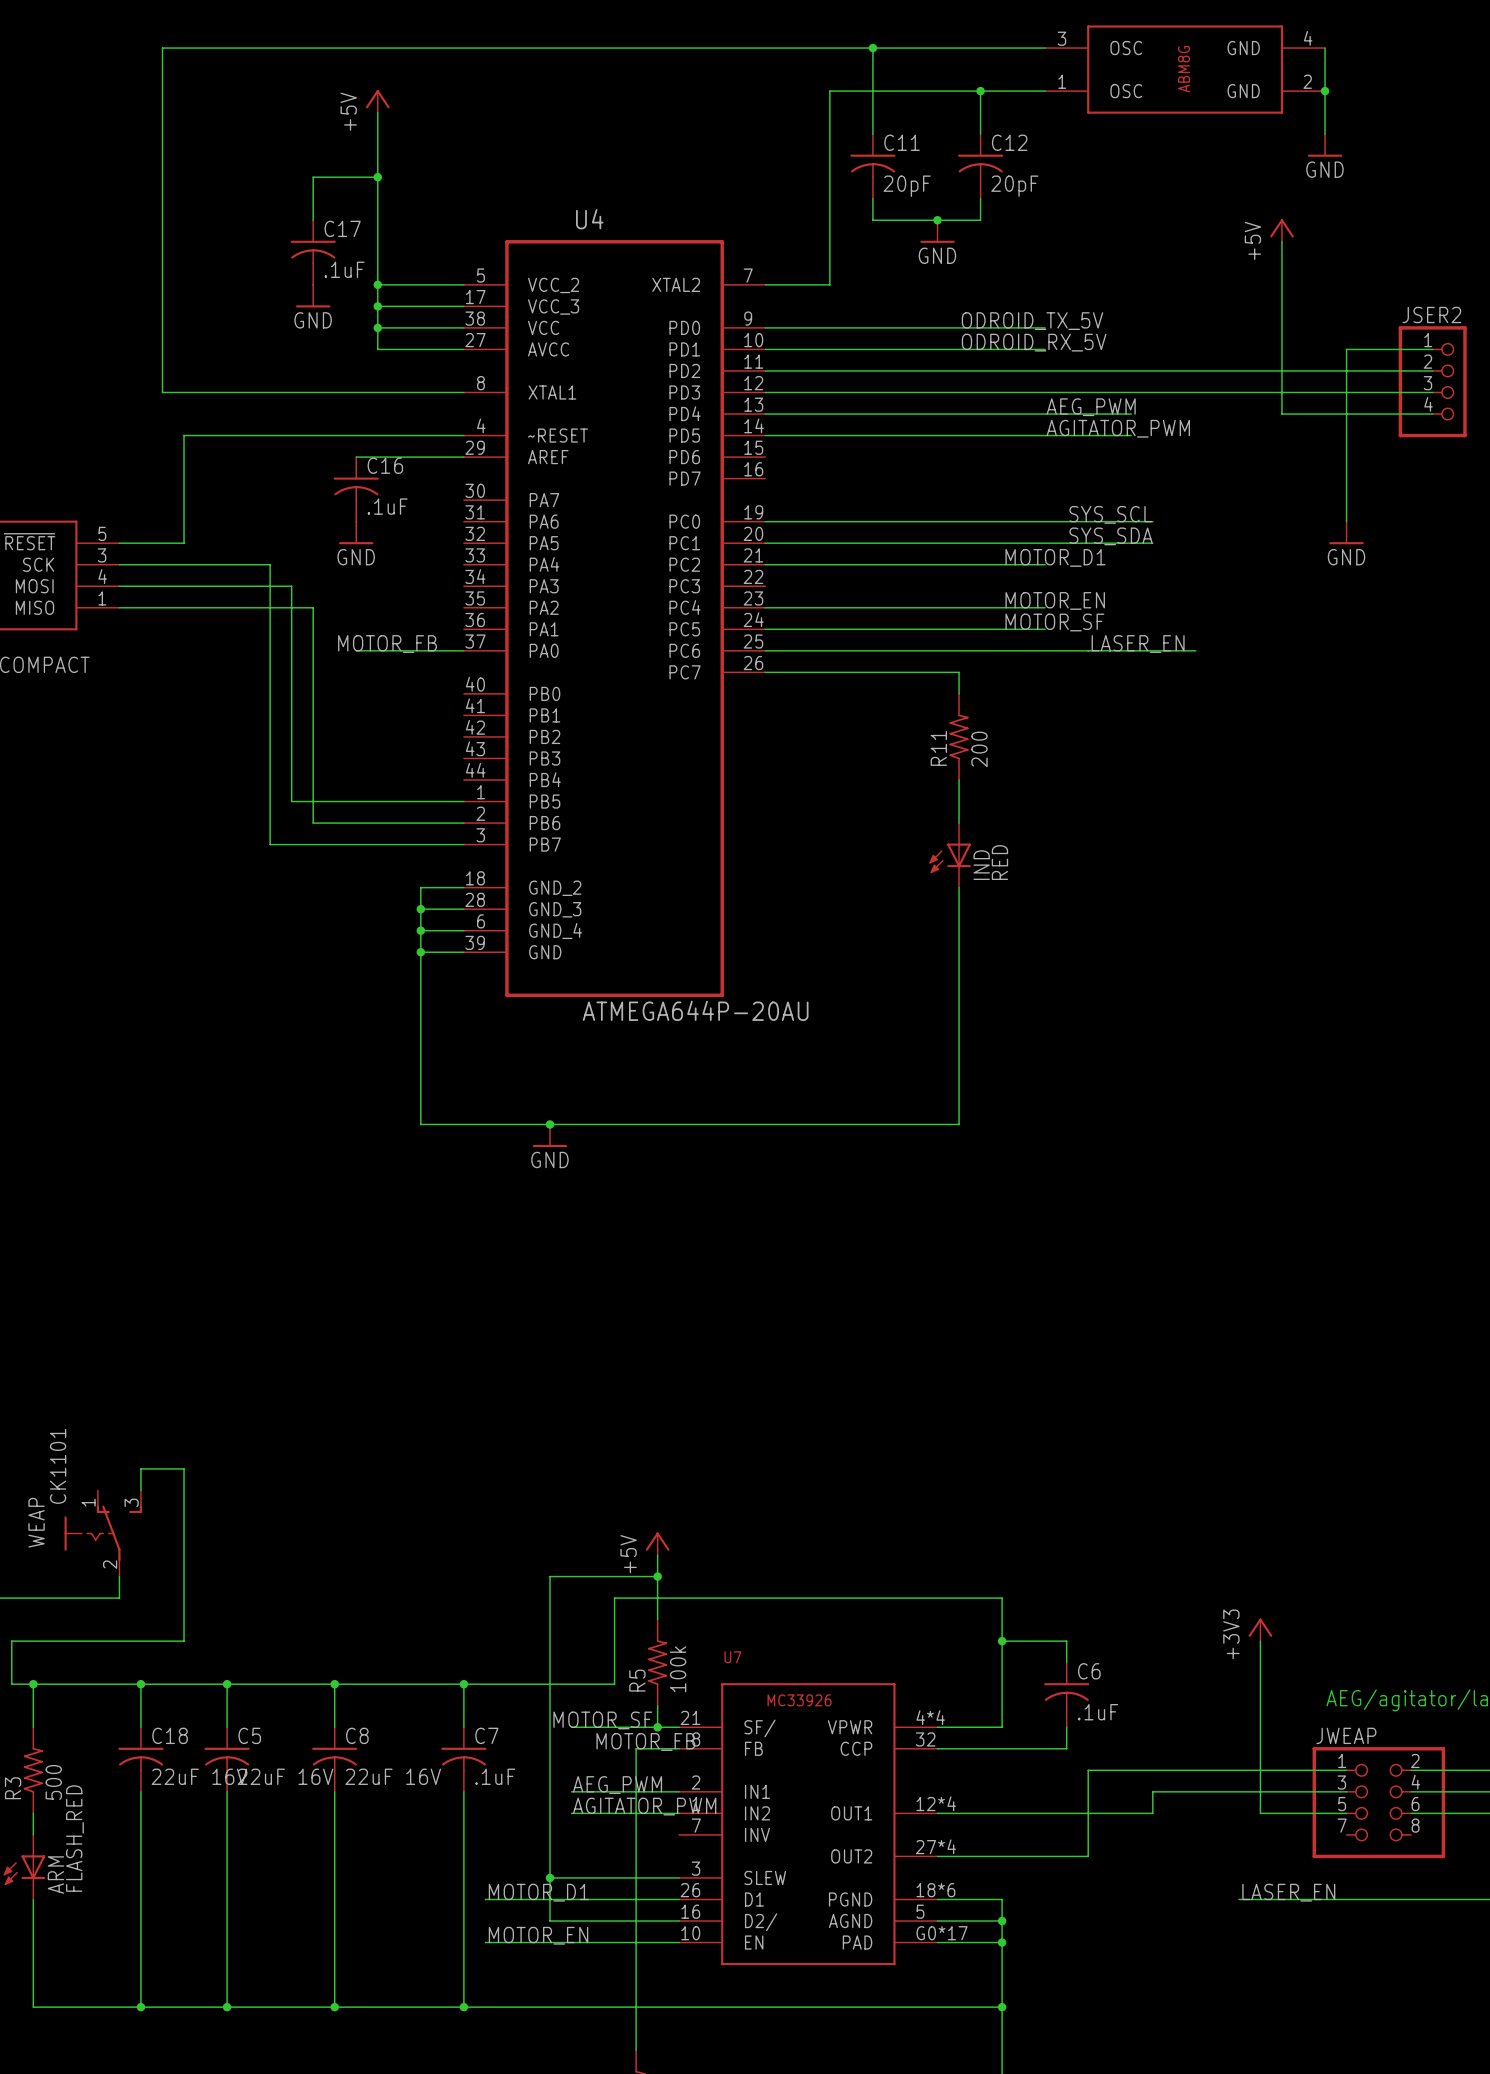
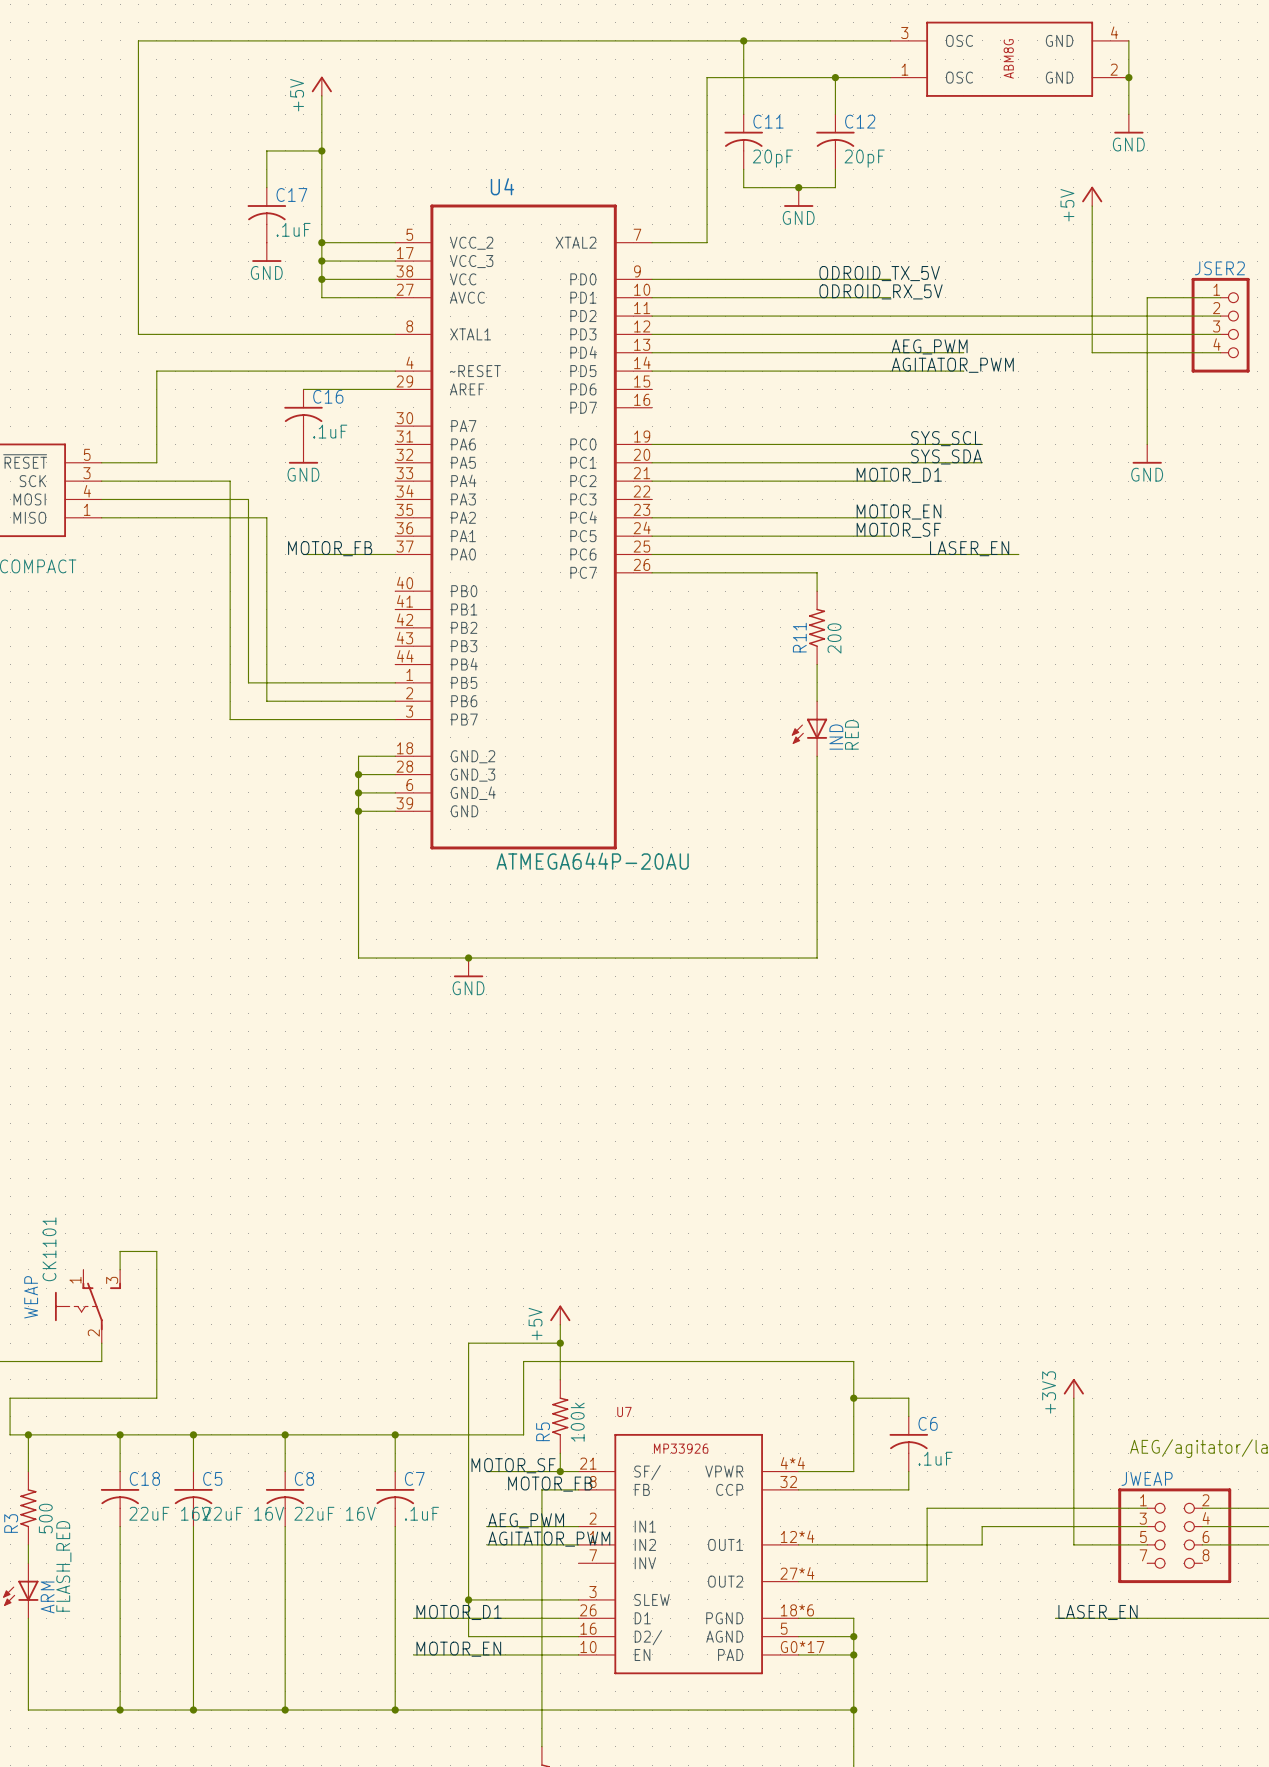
U7 text: MC33926 (799, 1700) -> MP33926 (681, 1448)

